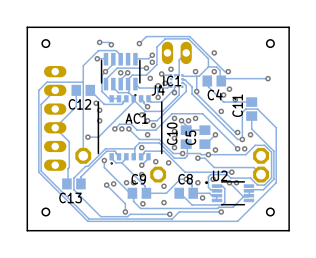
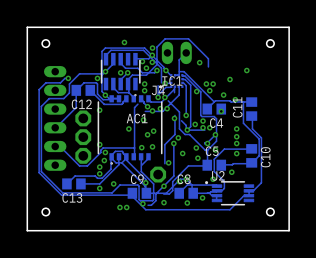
track: (99, 42) (109, 42) (111, 44) -> none
via: (99, 42) -> none
via: none -> (124, 42)
track: (139, 43) (146, 36) (189, 36) (224, 71) (228, 71) -> none
via: (139, 43) -> none
via: (111, 44) -> none
via: none -> (152, 48)
via: (214, 52) -> none
track: (97, 58) (105, 59) -> (161, 82) (161, 68) (143, 50) (110, 50) (106, 54) (105, 59)
via: (97, 58) -> none
track: (120, 59) (120, 55) (116, 50) (98, 50) (83, 65) (83, 155) -> (120, 59) (121, 63) (125, 68) (137, 68) (142, 72) (154, 72) (157, 70)
via: none -> (142, 61)
via: none -> (199, 62)
track: (146, 68) (117, 68) (106, 78) (105, 84) -> none
via: (171, 69) -> none
via: none -> (157, 70)
via: none -> (165, 70)
via: none -> (246, 70)
track: none -> (179, 71) (183, 71) (214, 101)
via: (195, 71) -> none
via: (214, 71) -> none
via: (228, 71) -> none
track: (161, 73) (171, 75) -> (102, 75) (102, 51) (105, 48) (144, 48) (171, 75)
via: (161, 73) -> none
track: (182, 75) (199, 76) (208, 66) (216, 66) (220, 70) (220, 81) (221, 81) (220, 78) (268, 78) -> (182, 75) (200, 91) (200, 115) (214, 116) (216, 118) (216, 141) (207, 150)
track: (196, 76) (196, 93) (235, 132) (237, 132) -> none
via: none -> (68, 78)
via: none -> (97, 78)
via: (150, 78) -> none
via: (268, 78) -> none
track: (182, 79) (192, 86) (192, 93) (237, 139) (242, 139) (242, 112) (245, 109) (257, 109) (276, 127) (276, 182) (237, 221) (87, 221) (38, 172) (38, 90) (47, 82) (83, 82) -> (182, 79) (190, 85) (190, 126) (187, 130)
via: none -> (229, 79)
track: (207, 81) (208, 86) (223, 102) (251, 102) -> (207, 109) (215, 100) (251, 102)
C4 position: (214, 81) -> (214, 109)
via: none -> (144, 83)
via: none -> (206, 83)
via: none -> (213, 83)
track: (135, 84) (139, 88) (171, 86) -> (157, 96) (165, 87) (171, 86)
via: (158, 85) -> none
via: (229, 89) -> none
track: (55, 90) (41, 104) (41, 171) (89, 219) (172, 219) (179, 211) (221, 211) -> none
track: (76, 90) (76, 106) (55, 127) (69, 141) (67, 183) -> (146, 193) (145, 179) (126, 160) (126, 156) (122, 151) (115, 151) (110, 155) (110, 169) (102, 178) (95, 176) (75, 176) (67, 183)
via: none -> (144, 90)
via: none -> (209, 90)
track: (186, 91) (156, 120) (147, 120) -> (186, 91) (186, 115)
via: (174, 92) -> none
via: none -> (164, 97)
track: none -> (119, 98) (103, 99) (97, 94) (96, 82) (84, 82) (76, 90) (76, 107) (55, 127)
track: none -> (168, 100) (179, 112) (179, 128) (185, 134) (189, 134) (207, 150)
track: none -> (243, 101) (243, 123) (259, 139) (259, 155) (251, 163) (221, 165)
via position: (96, 103) -> (105, 95)
via: none -> (160, 108)
via: none -> (167, 108)
via: none -> (152, 110)
track: (141, 114) (145, 111) (133, 98) (134, 100) (98, 137) (87, 137) -> none
via: (141, 114) -> none
track: none -> (174, 115) (174, 134) (164, 144) (164, 163)
via: none -> (186, 115)
track: (251, 116) (251, 128) (273, 151) (273, 179) (263, 189) (249, 189) (249, 195) (243, 196) -> (251, 116) (252, 128) (261, 137) (261, 182) (253, 190) (249, 190) (248, 195) (243, 196) (229, 209) (145, 209) (133, 197) (133, 194) (132, 193) (133, 195) (61, 195) (39, 172) (39, 89) (45, 82) (60, 82) (64, 78) (68, 78)
part: none -> (83, 118)
via: (195, 118) -> none
via: none -> (143, 119)
via: (99, 120) -> none
via: (147, 120) -> none
via: (181, 120) -> none
via: (188, 120) -> none
via: none -> (203, 121)
via: none -> (195, 124)
via: (153, 125) -> none
via: none -> (203, 127)
via: none -> (209, 127)
track: (114, 128) (119, 124) (131, 124) (137, 130) (155, 130) (172, 113) (202, 113) (237, 148) -> none
via: (114, 128) -> none
via: (121, 128) -> none
track: (128, 128) (139, 139) (159, 139) (173, 153) (182, 153) -> none
via: none -> (236, 128)
via: none -> (187, 130)
via: none -> (153, 131)
via: (174, 131) -> none
via: (237, 132) -> none
C10 name position: C10 (172, 133) -> C10 (265, 157)
via: (250, 134) -> none
via: none -> (236, 136)
part: none -> (83, 137)
via: (87, 137) -> none
via: none -> (178, 137)
C10 position: (186, 137) -> (251, 155)
C5 rotation: 0° (204, 137) -> 90° clockwise (214, 165)
C5 position: (204, 137) -> (214, 165)
via: (174, 138) -> none
via: (242, 139) -> none
track: none -> (173, 143) (173, 176) (155, 194) (155, 200) (151, 205) (148, 205)
via: none -> (173, 143)
via: none -> (207, 143)
via: none -> (236, 143)
via: none -> (99, 144)
track: (186, 144) (187, 155) (185, 158) (174, 158) (159, 142) (139, 142) (134, 147) (133, 156) -> (137, 104) (134, 107) (133, 156)
track: none -> (55, 146) (60, 146) (79, 165) (87, 165) (103, 147) (134, 147)
via: none -> (152, 146)
via: (174, 147) -> none
via: none -> (196, 147)
track: (134, 148) (105, 148) (73, 178) (73, 189) (100, 216) (169, 214) -> none
via: (237, 148) -> none
via: (244, 148) -> none
track: none -> (251, 148) (224, 149) (214, 159) (214, 171) (224, 181) (224, 188) (222, 190) (207, 192)
track: none -> (207, 150) (207, 165) (188, 165) (172, 181) (172, 190) (169, 194) (163, 194)
via: none -> (105, 152)
track: (187, 153) (245, 154) (255, 145) (264, 145) (271, 152) (271, 178) (264, 185) (257, 185) (250, 178) (230, 178) (227, 174) (210, 174) (208, 176) (208, 187) (217, 190) -> none
via: none -> (236, 153)
via: (208, 154) -> none
part: (261, 155) -> none
track: (119, 156) (114, 151) (106, 151) (80, 176) (80, 183) -> (119, 156) (118, 164) (99, 183) (80, 183)
track: (141, 156) (145, 151) (163, 151) (185, 172) (231, 172) -> (141, 156) (141, 171) (153, 183) (152, 200) (139, 199) (137, 185) (119, 185) (112, 192) (62, 192) (41, 171) (41, 106) (49, 98) (63, 98) (69, 92) (69, 83) (79, 73) (102, 73)
track: (197, 158) (204, 158) (214, 167) (254, 167) (261, 174) -> none
track: (104, 160) (104, 167) (130, 193) (133, 193) (133, 201) (140, 208) (232, 207) (243, 196) -> none
via: (155, 161) -> none
via: (141, 165) -> none
via: none -> (99, 167)
via: none -> (99, 173)
via: (141, 174) -> none
part: (261, 174) -> none
via: none -> (179, 181)
via: (126, 182) -> none
via: (133, 182) -> none
via: none -> (145, 182)
via: (197, 182) -> none
track: (229, 182) (243, 196) -> none
via: (229, 182) -> none
via: (236, 182) -> none
track: (106, 185) (125, 203) (125, 211) -> none
via: (106, 185) -> none
track: (217, 186) (222, 186) (224, 188) (224, 202) (222, 204) (192, 204) (179, 193) -> (217, 186) (187, 185) (179, 193)
via: none -> (99, 188)
via: none -> (187, 203)
via: none -> (119, 207)
via: none -> (126, 207)
via: (125, 211) -> none
via: (221, 211) -> none
via: (169, 214) -> none

